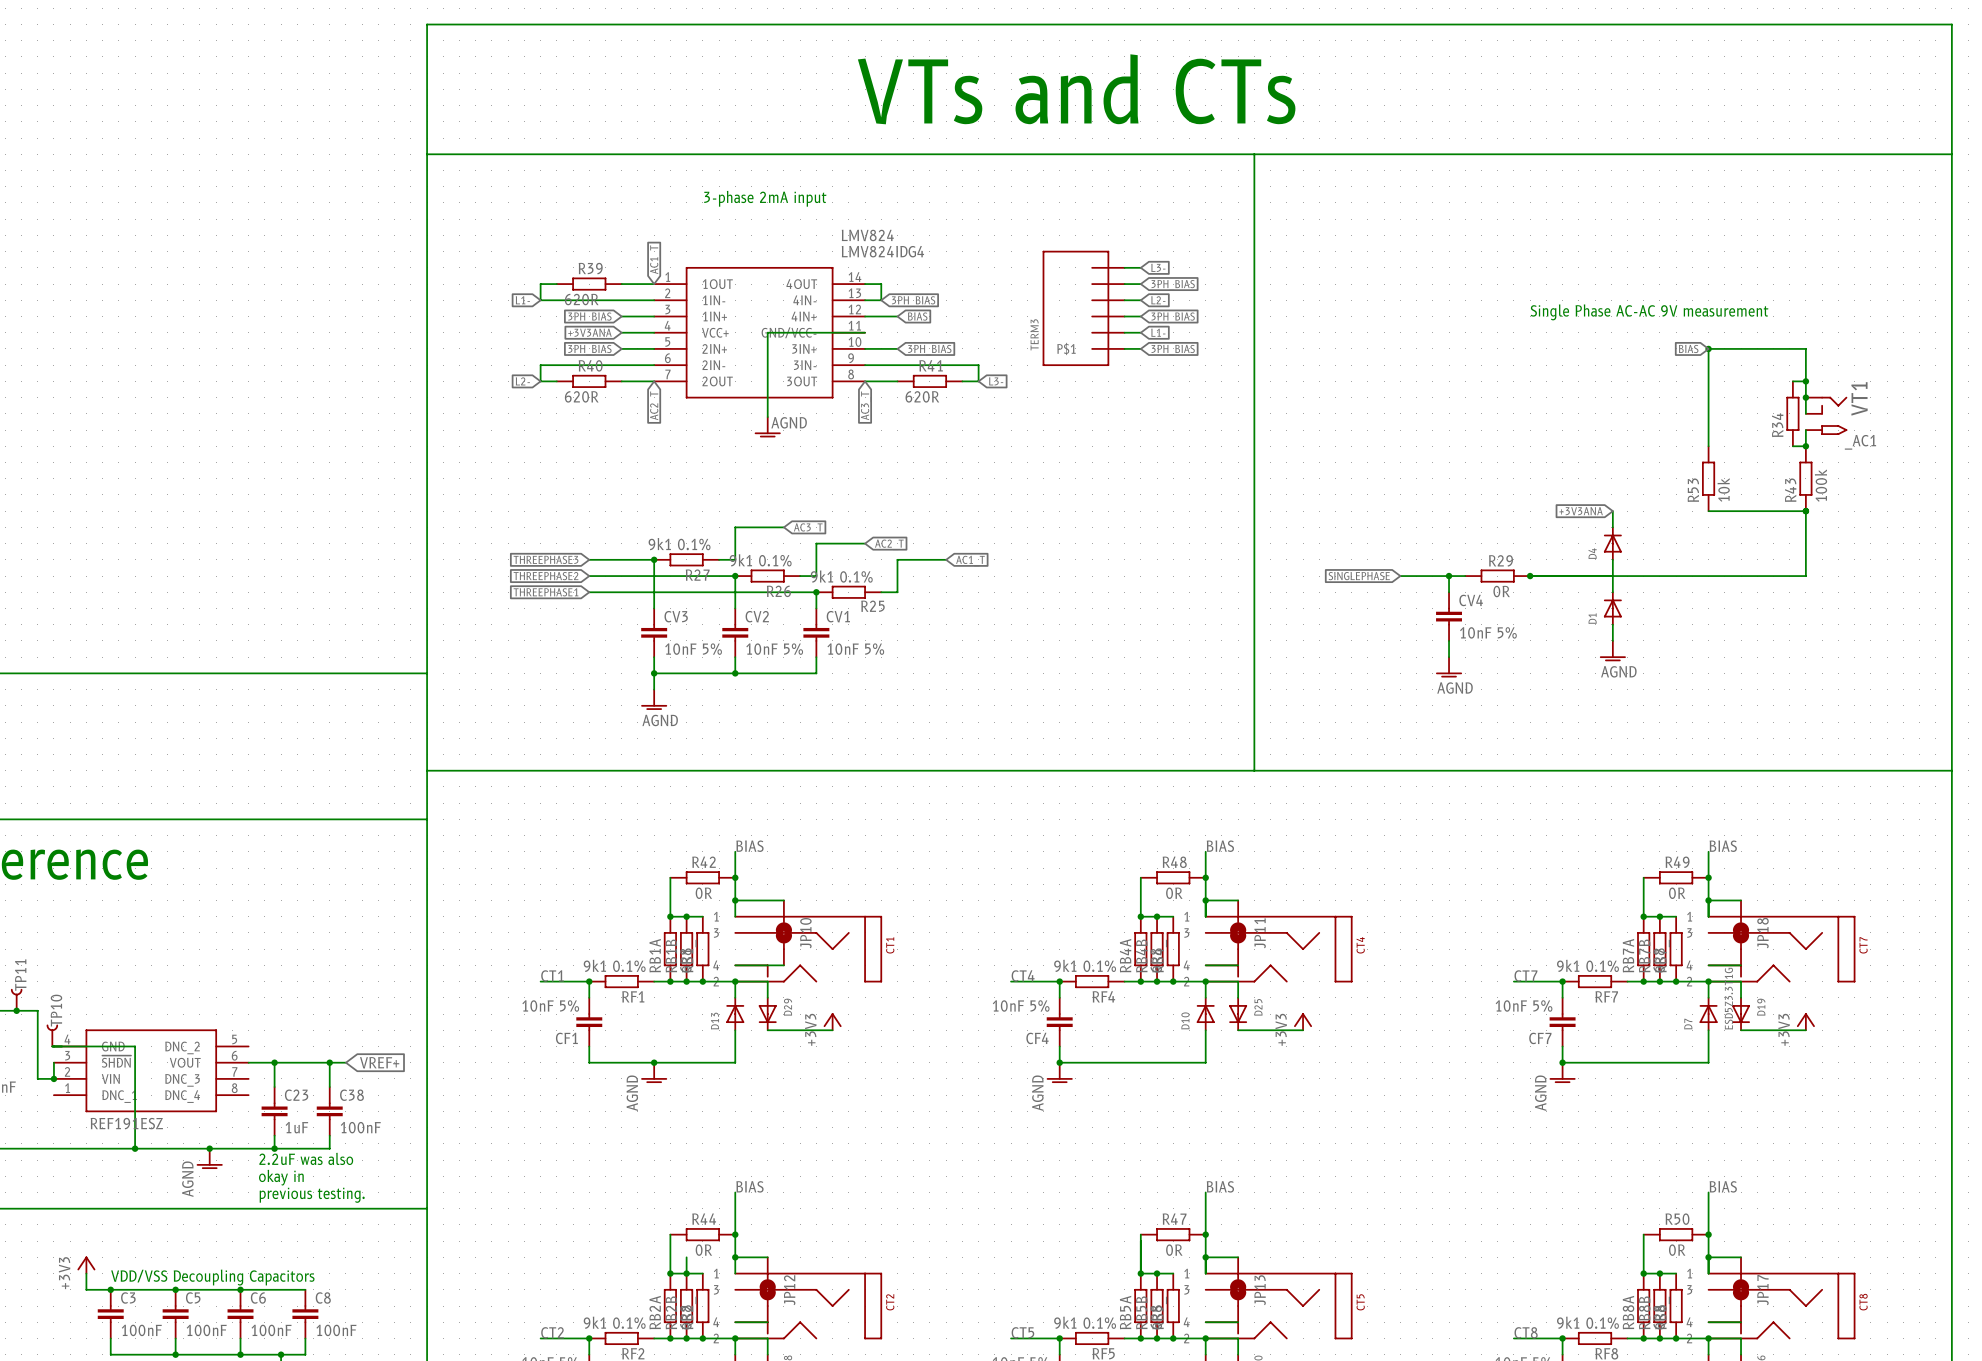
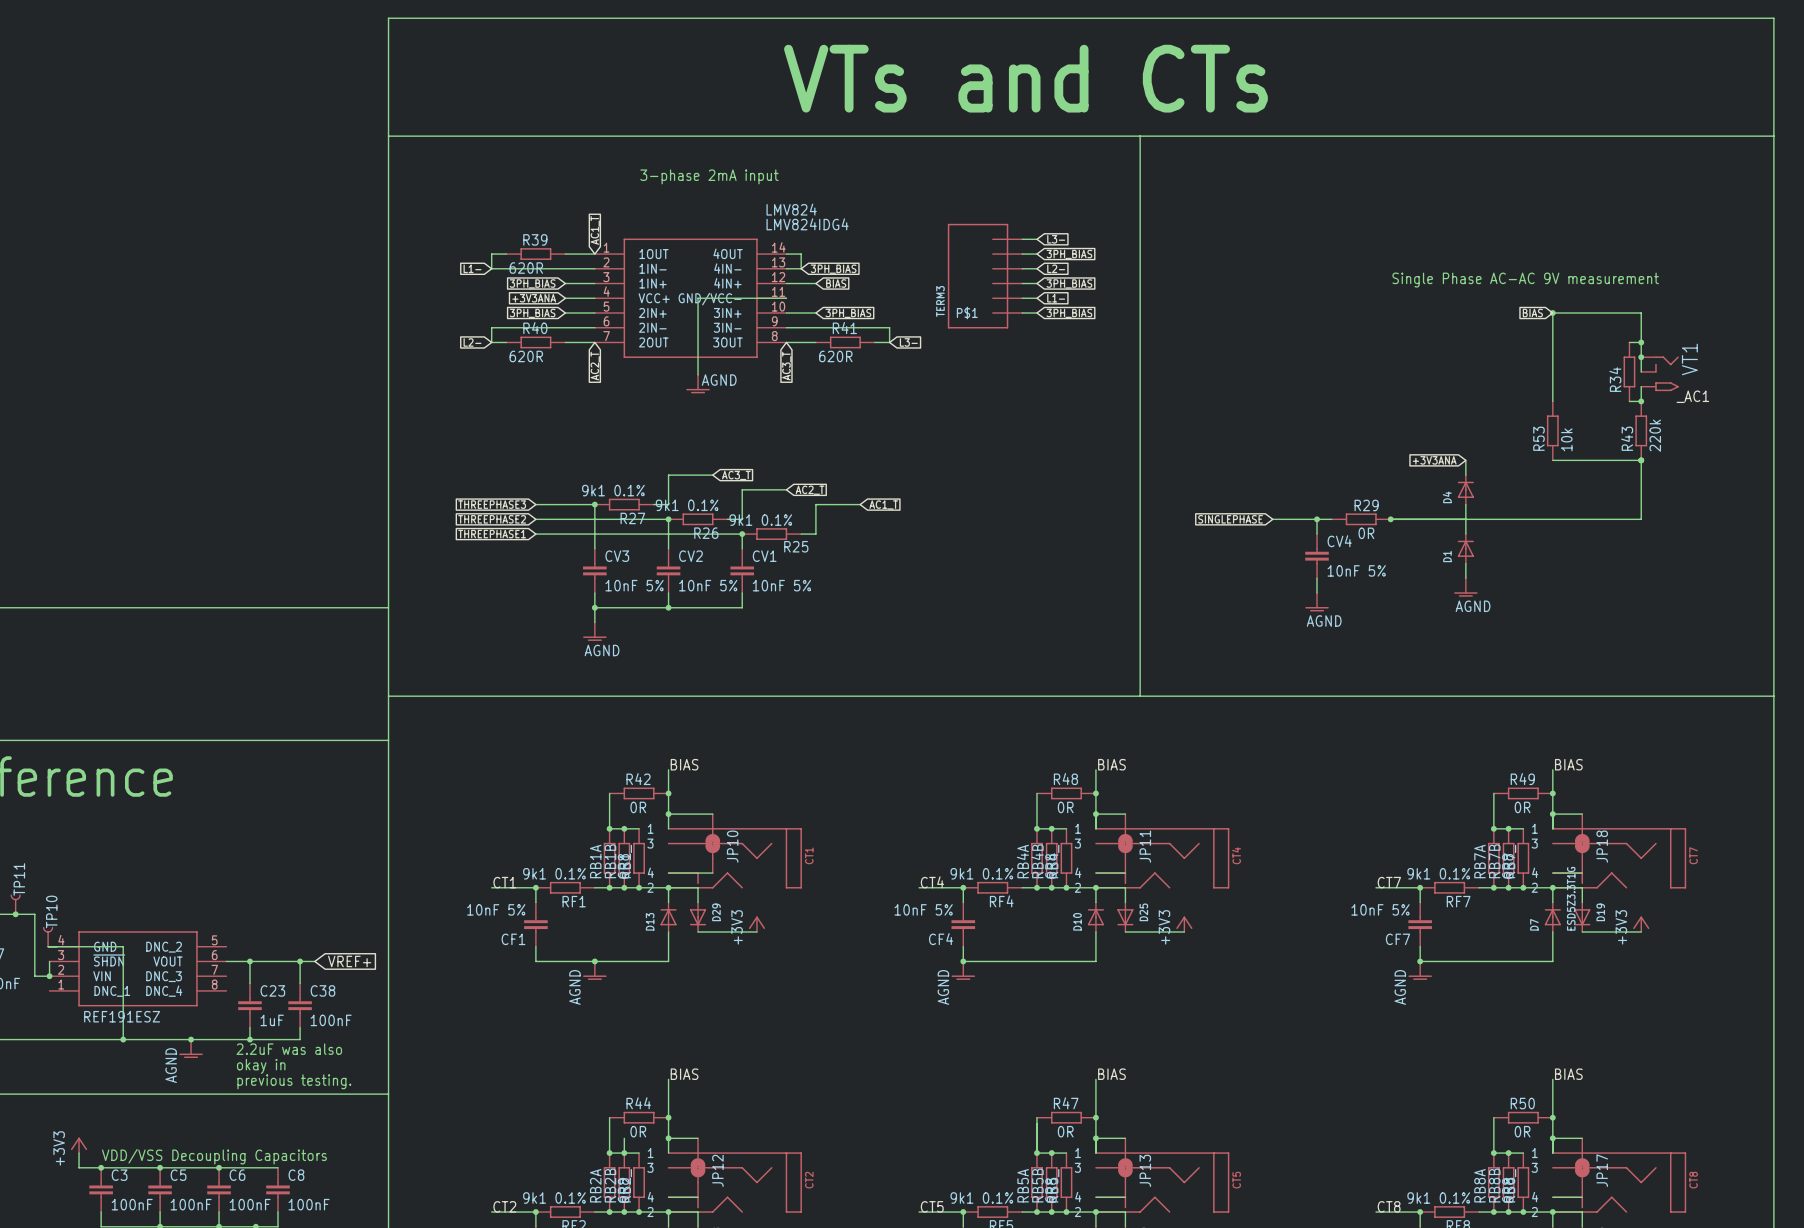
R43 value: 100k (1821, 485) -> 220k (1655, 435)

